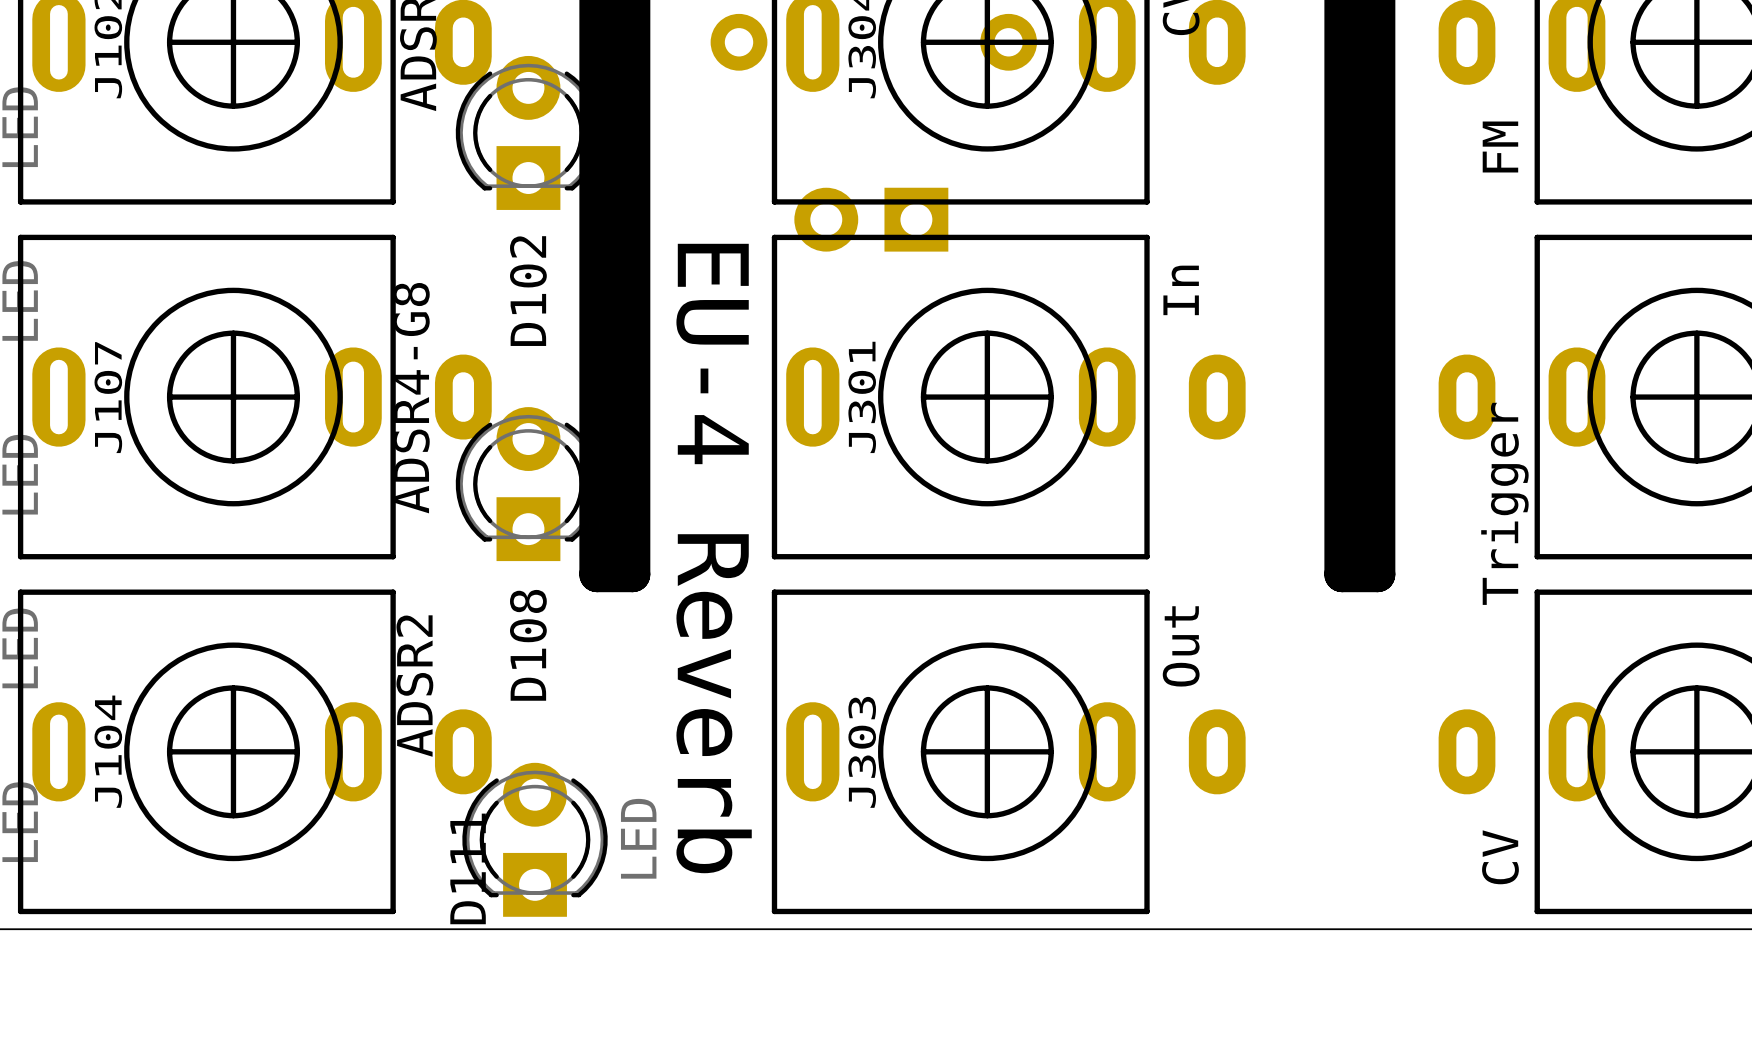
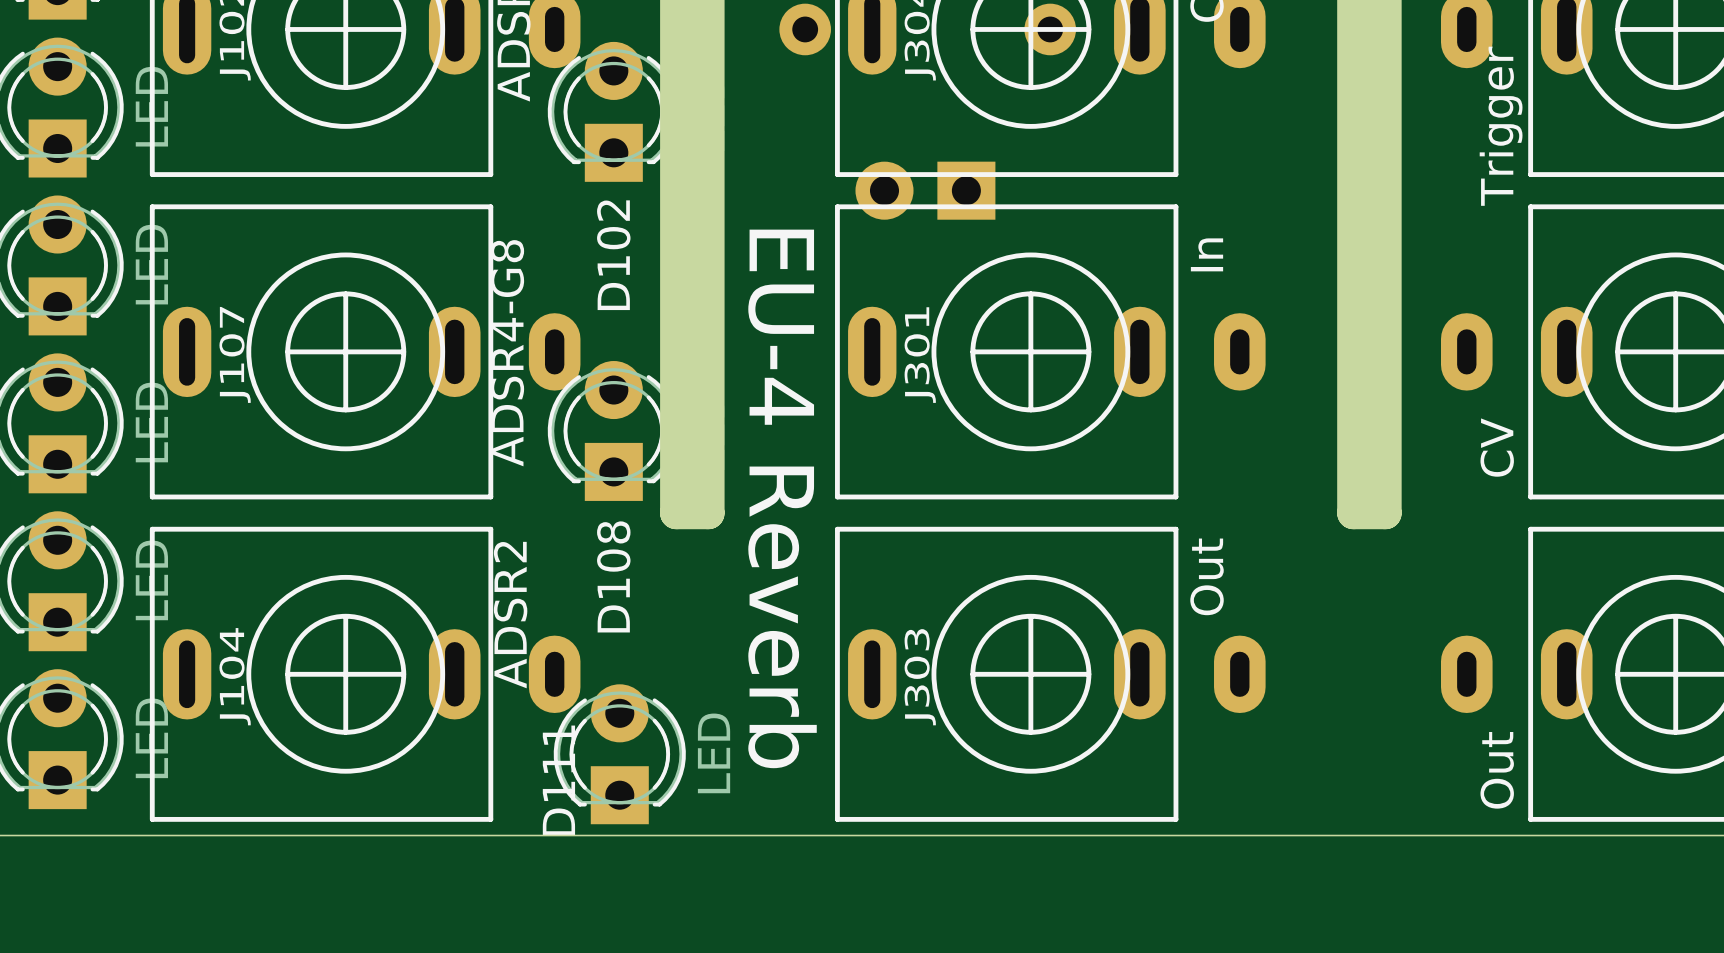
part value: FM (1500, 147) -> Trigger (1501, 126)
part value: Trigger (1504, 503) -> CV (1497, 447)
part value: CV (1500, 857) -> Out (1497, 770)

